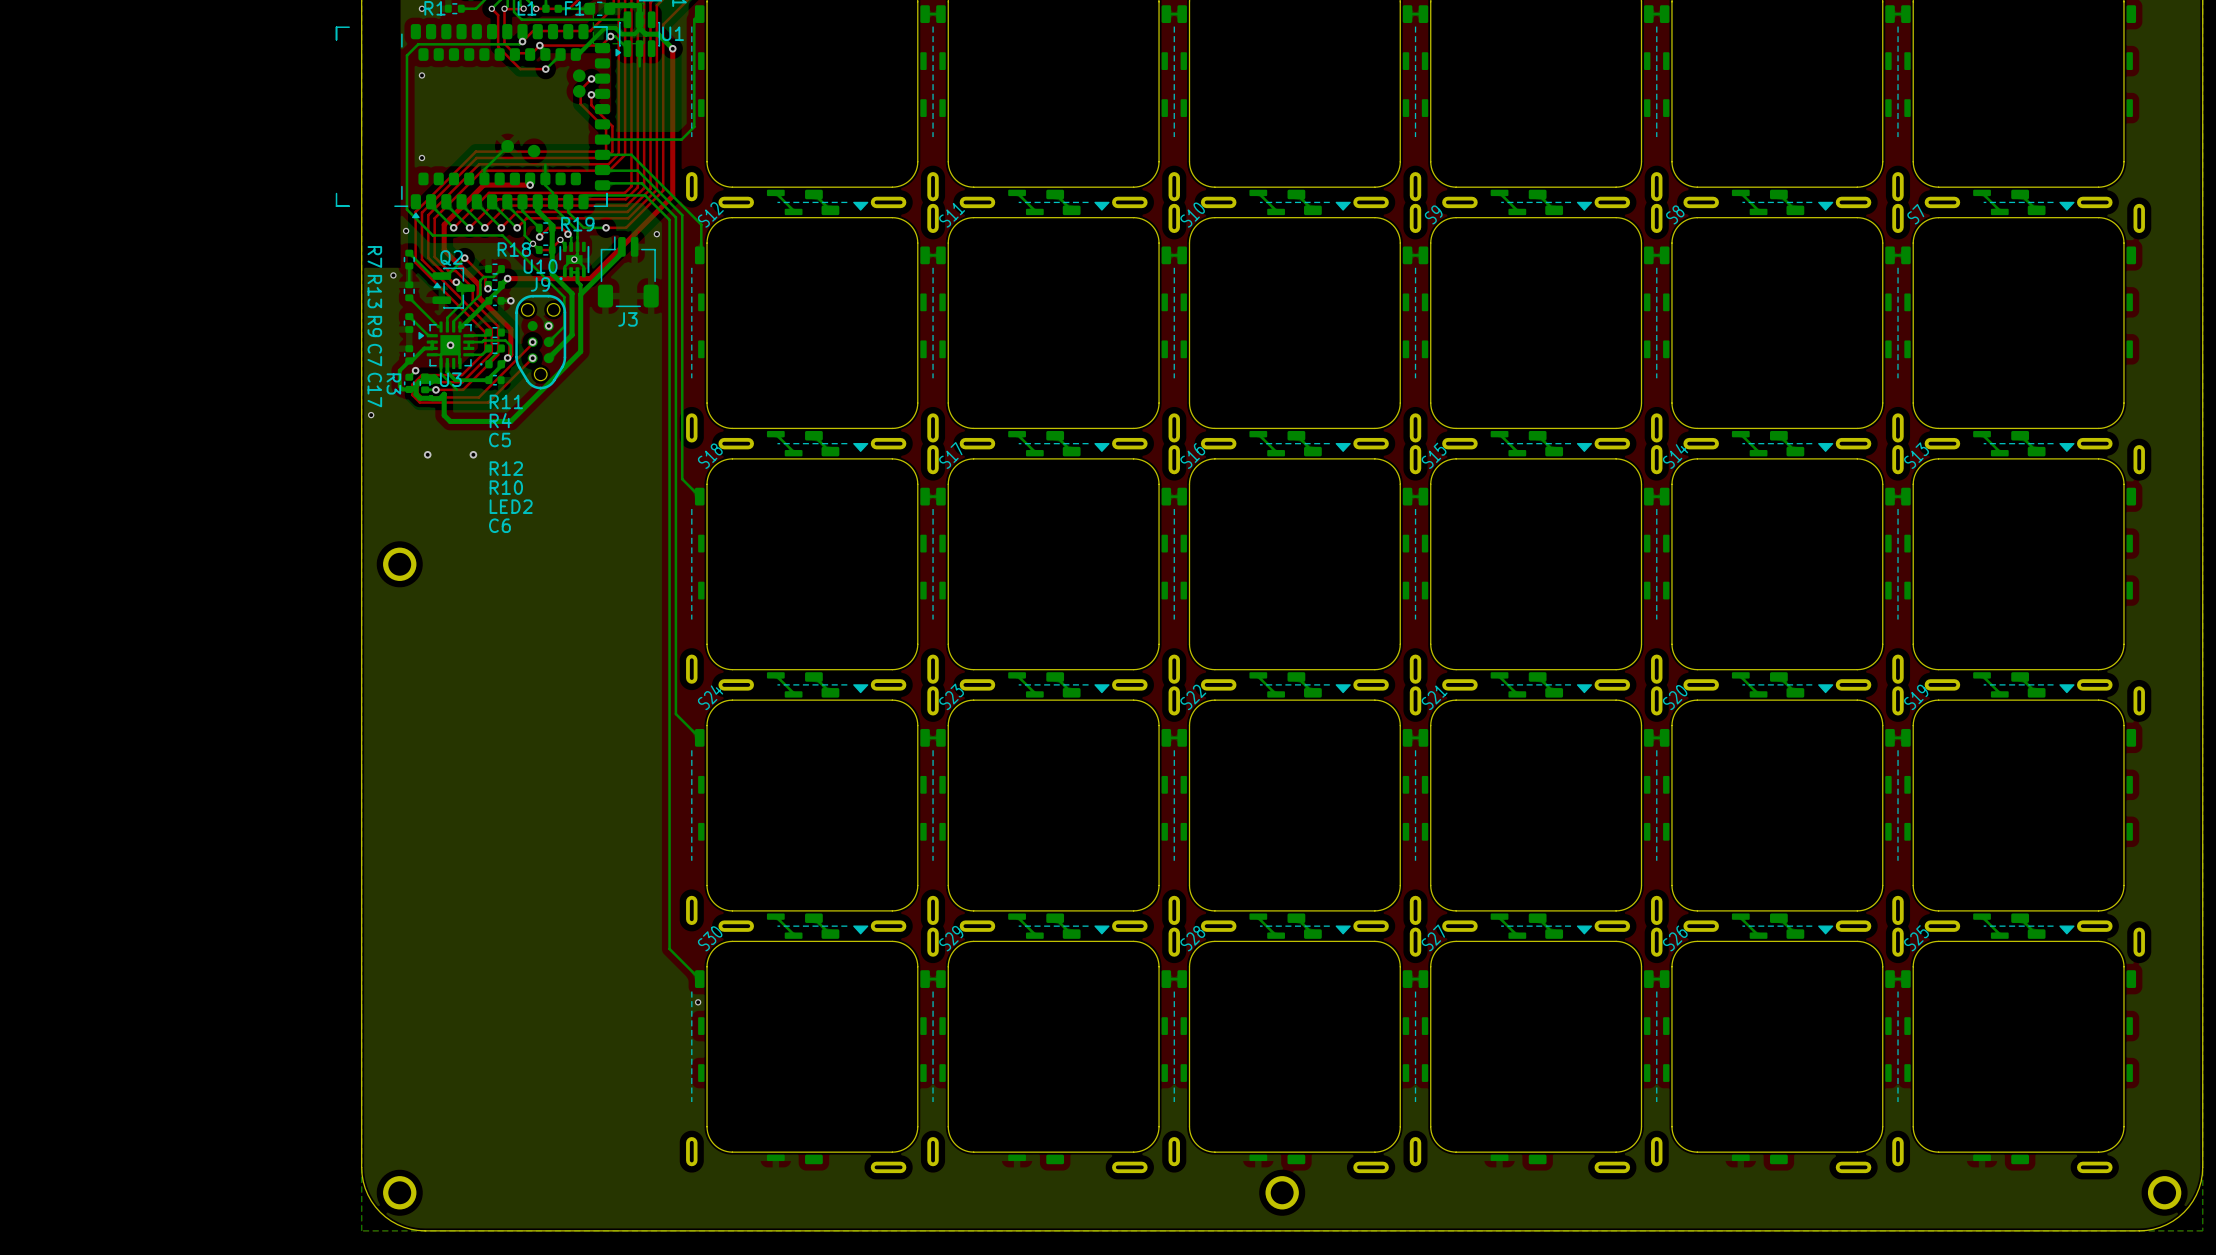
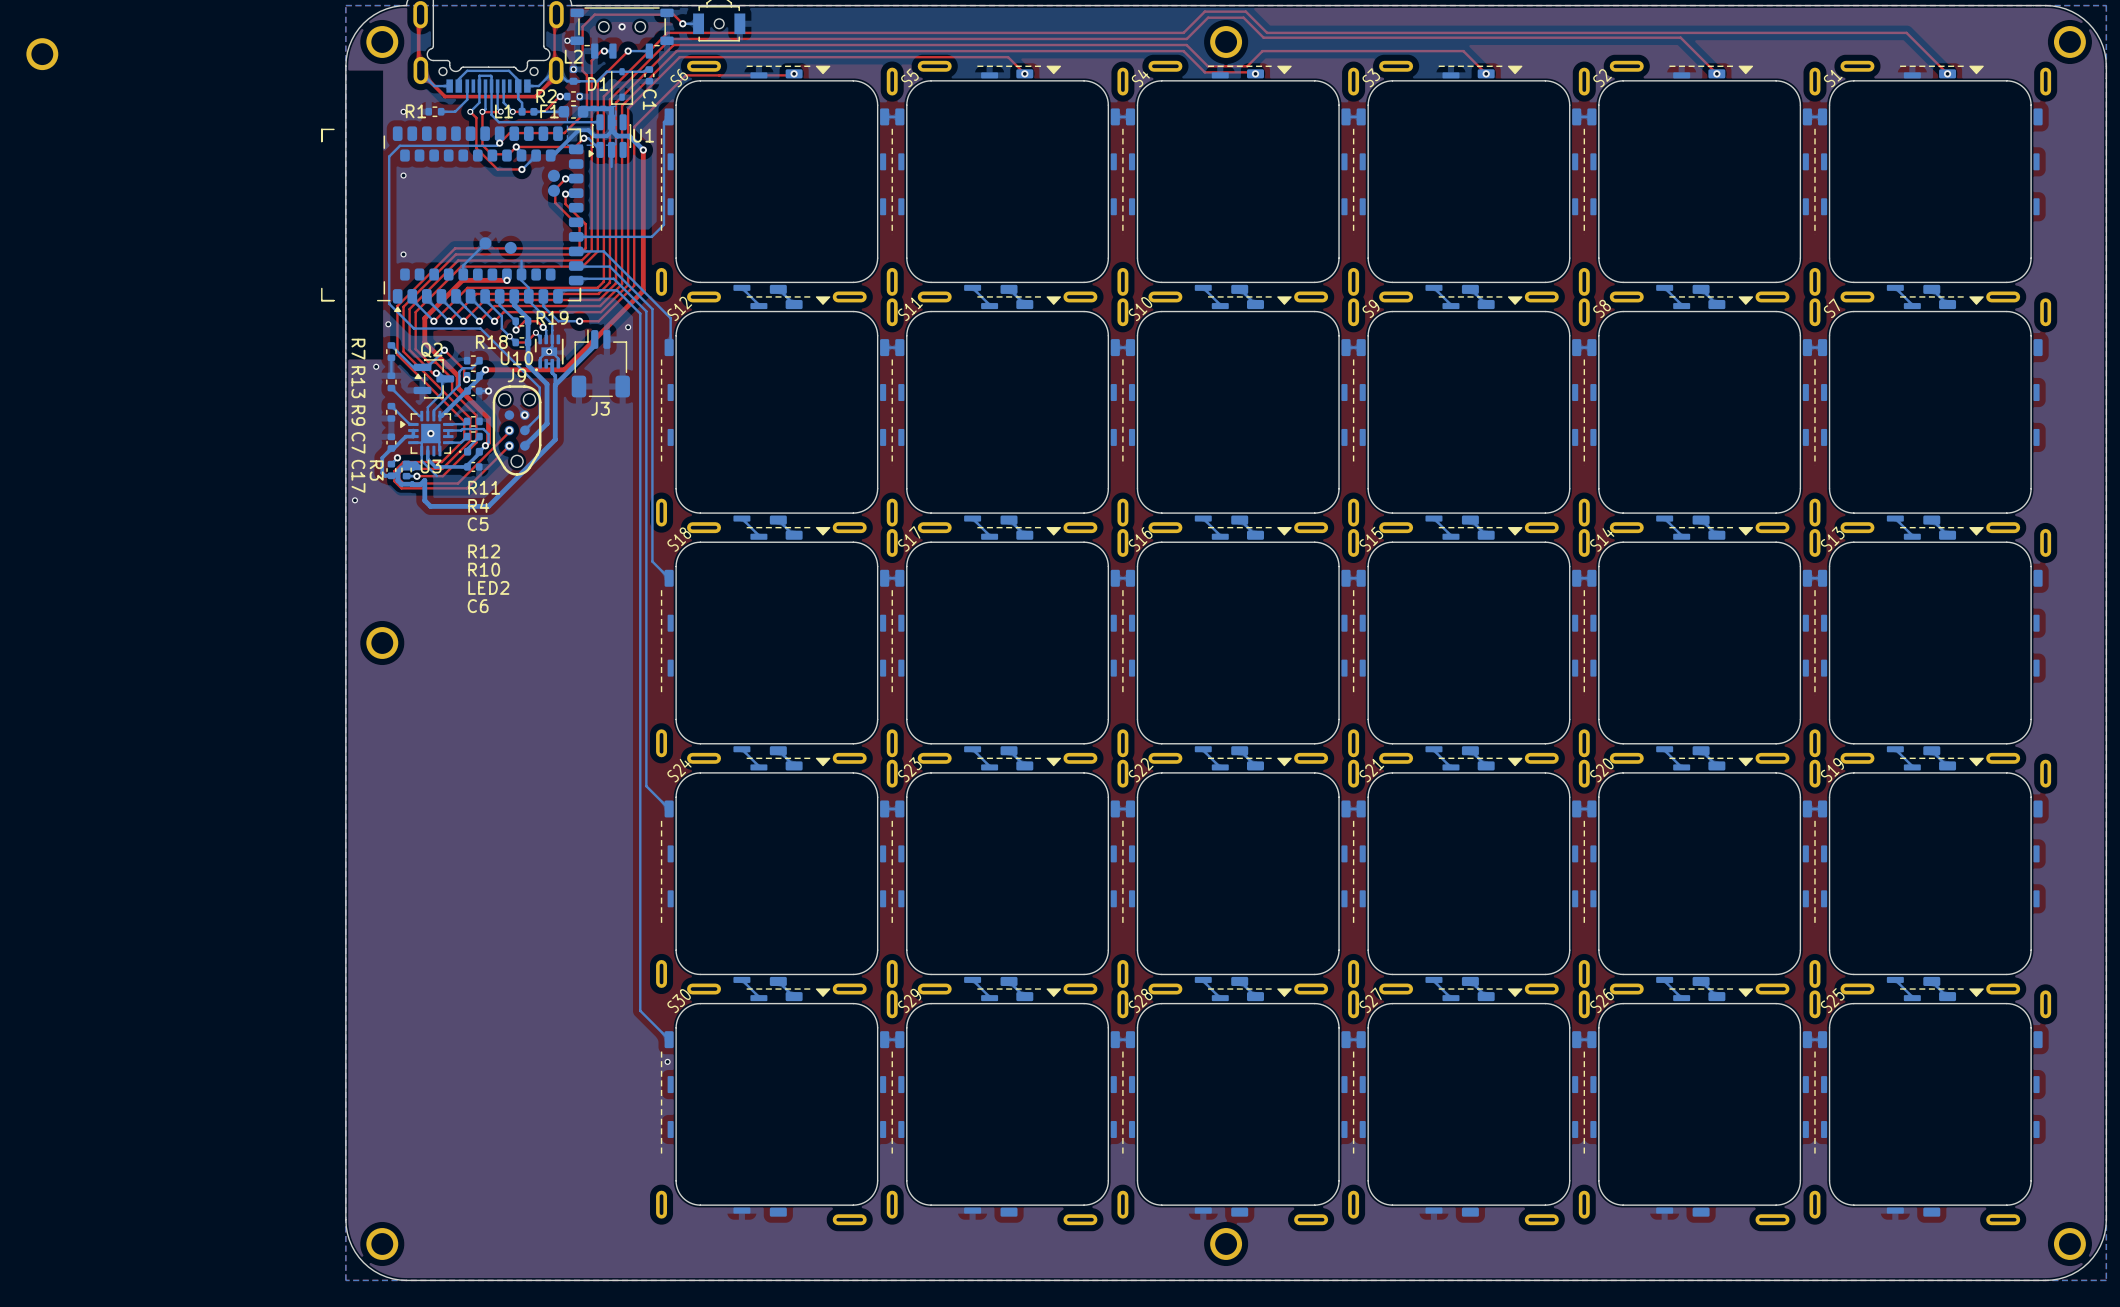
via: (427, 454) -> none
via: (473, 454) -> none

